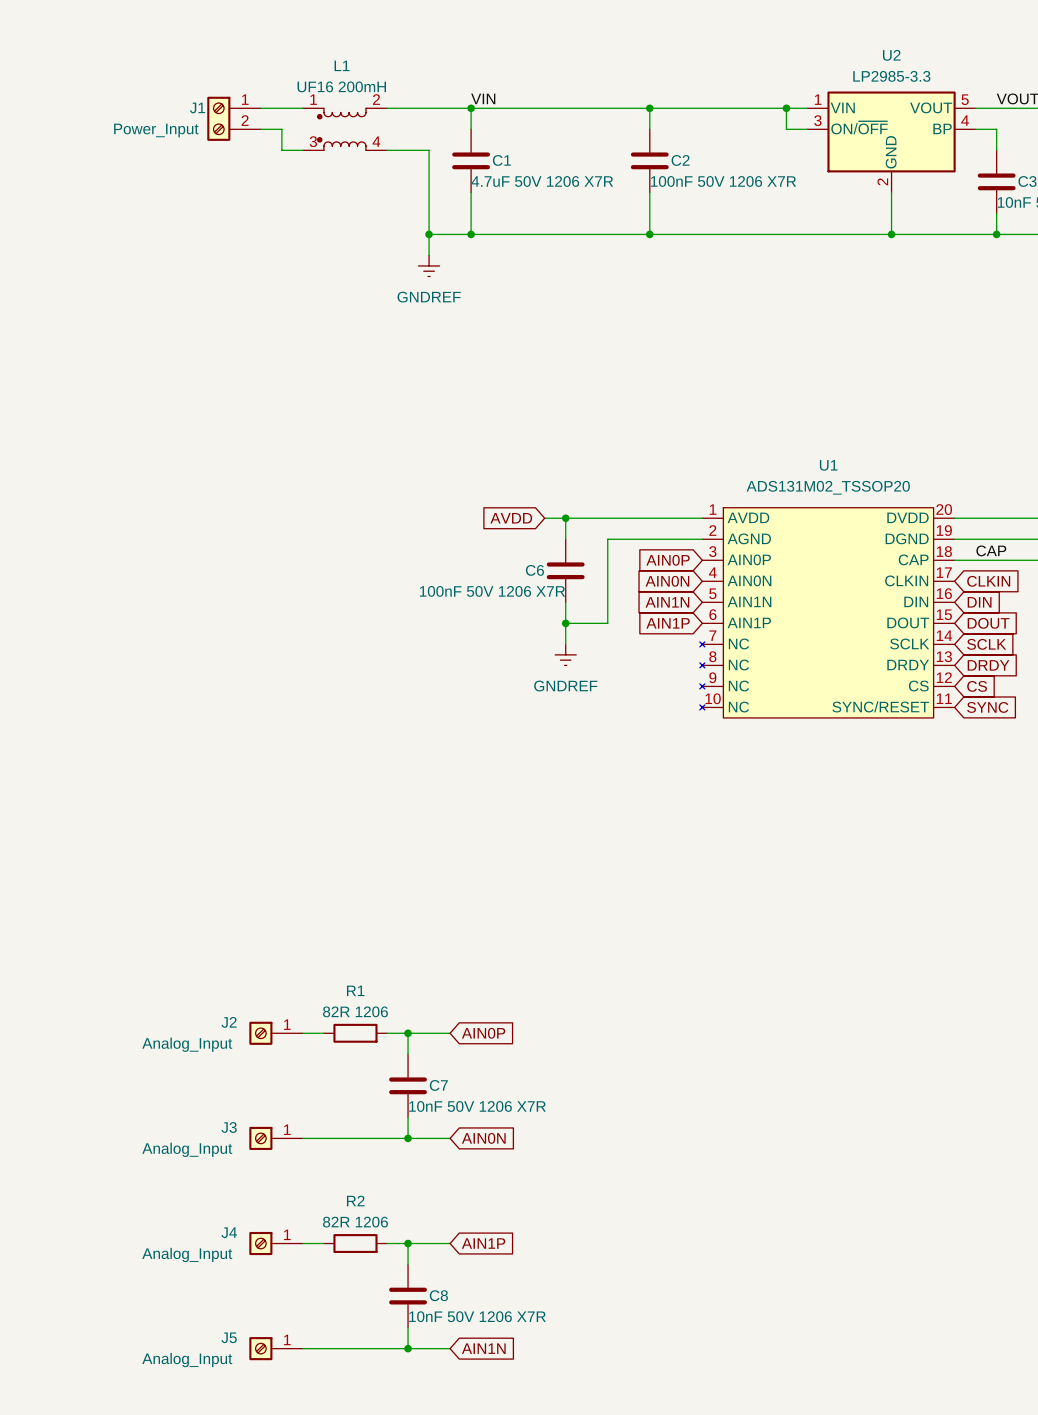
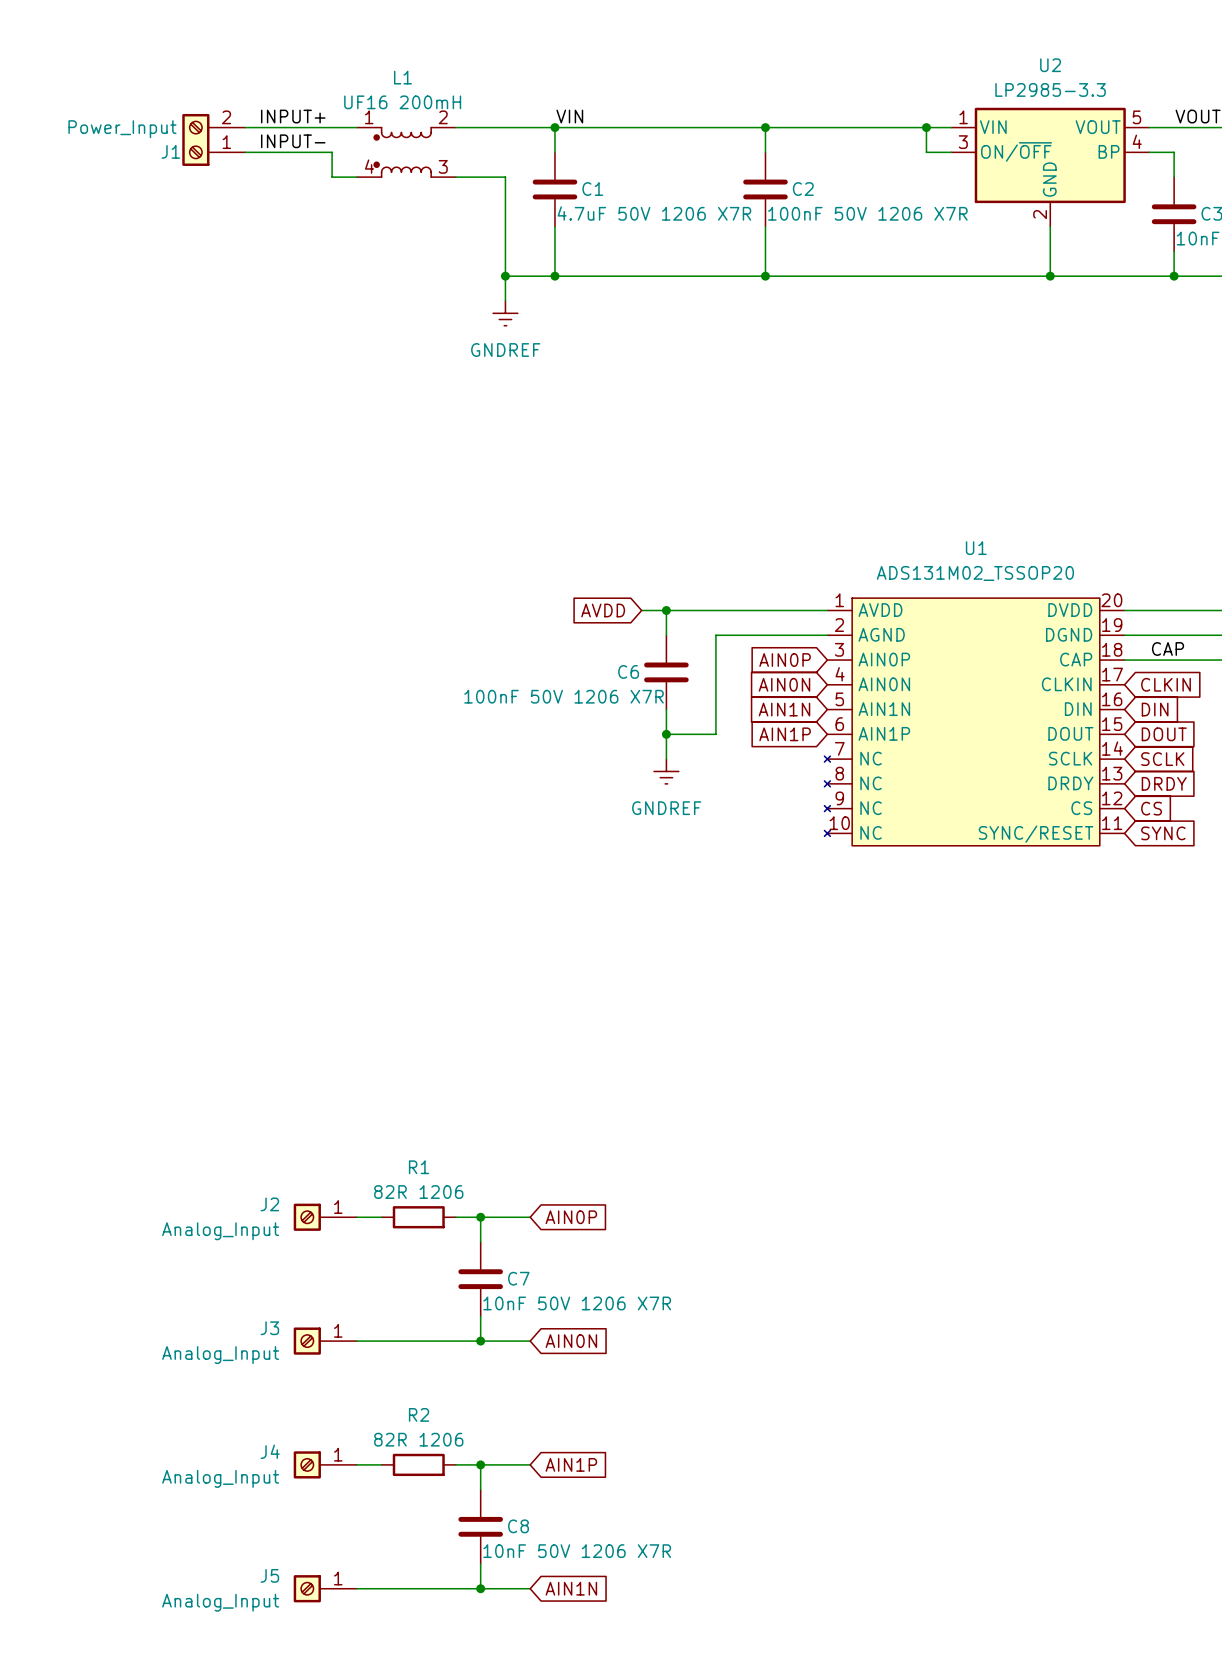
label: none -> INPUT+ (293, 116)
J1 flip: as is (218, 118) -> up-down (195, 139)
J1 position: (234, 118) -> (213, 139)
label: none -> INPUT- (293, 141)
L1 pin number: 3 (313, 141) -> 4 (369, 166)
L1 pin number: 4 (376, 141) -> 3 (443, 166)

